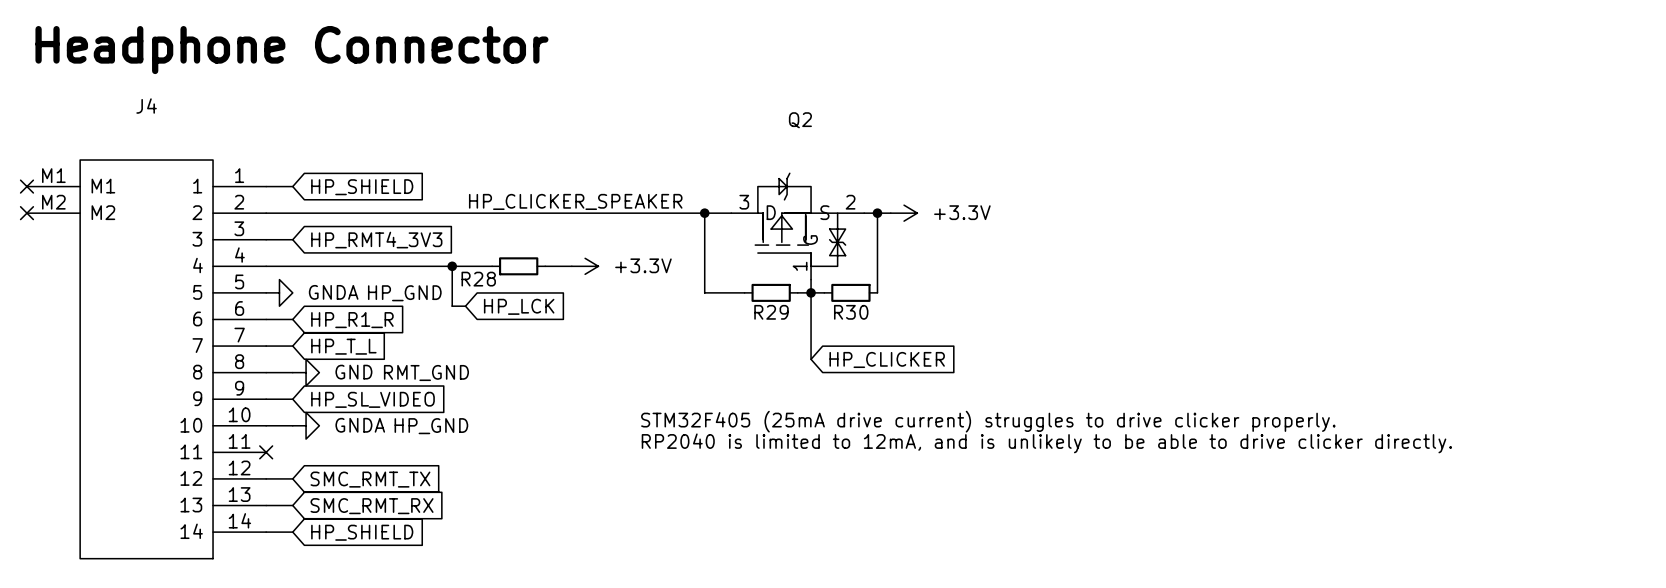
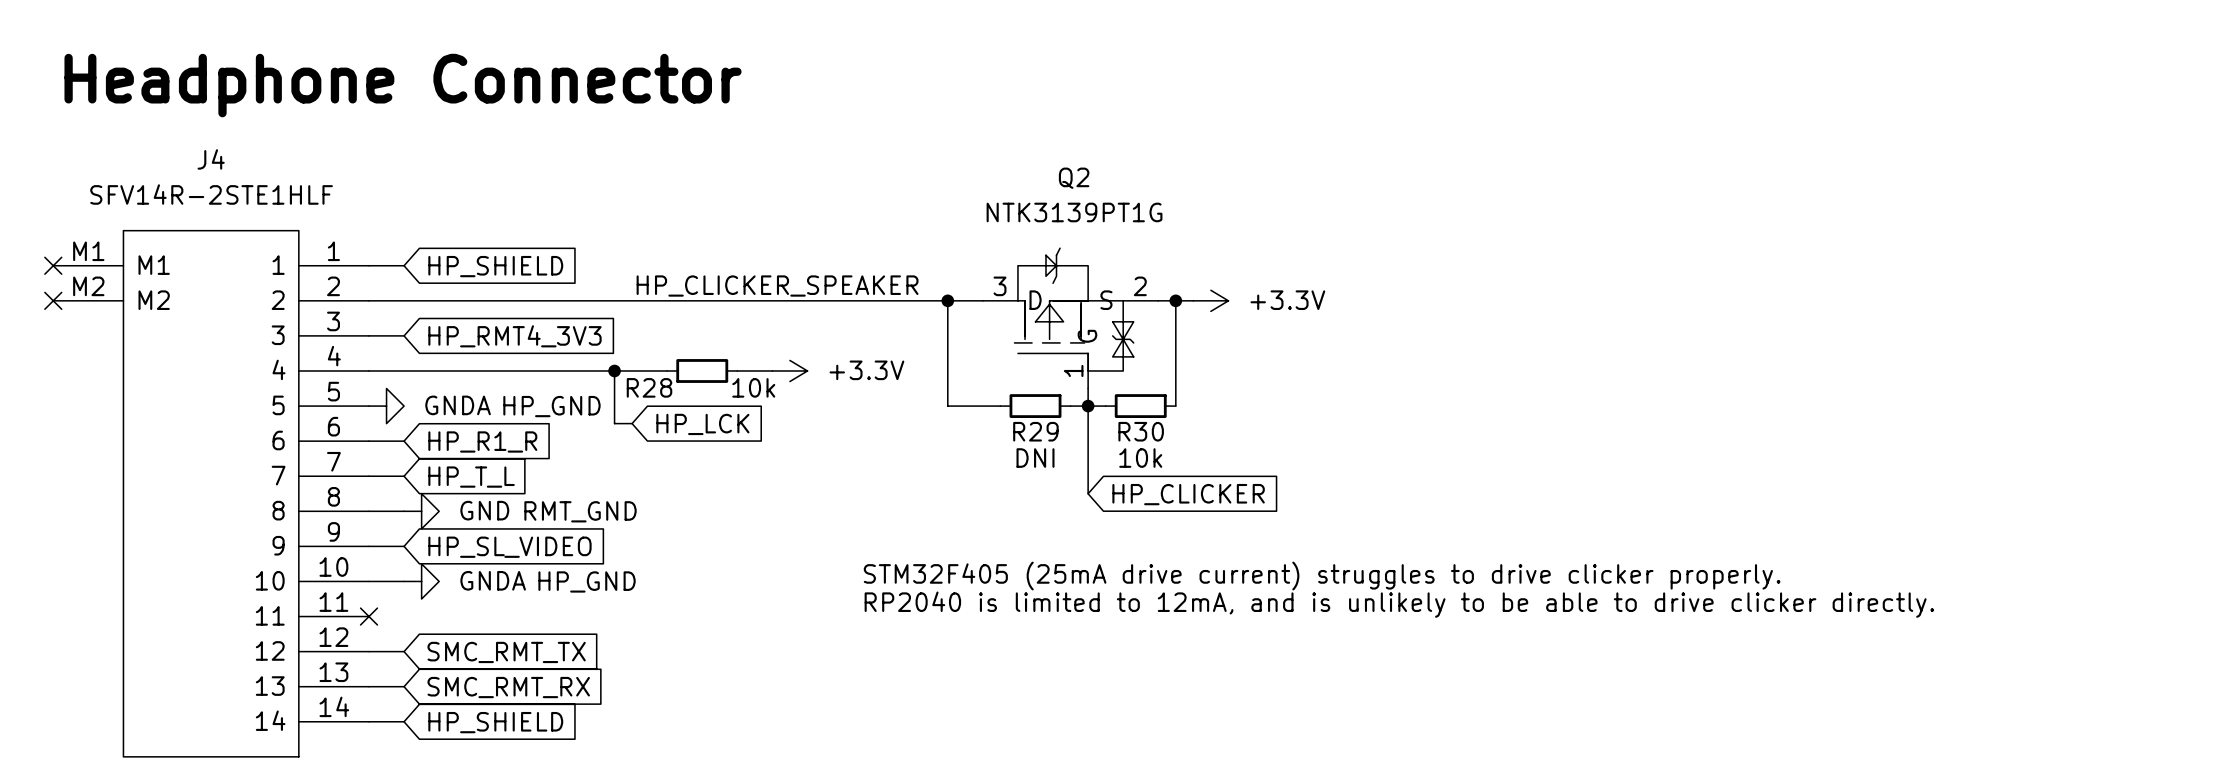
J4 value: none -> SFV14R-2STE1HLF (211, 194)
Q2 value: none -> NTK3139PT1G (1074, 212)
R28 value: none -> 10k (753, 387)
R29 value: none -> DNI (1035, 458)
R30 value: none -> 10k (1140, 458)

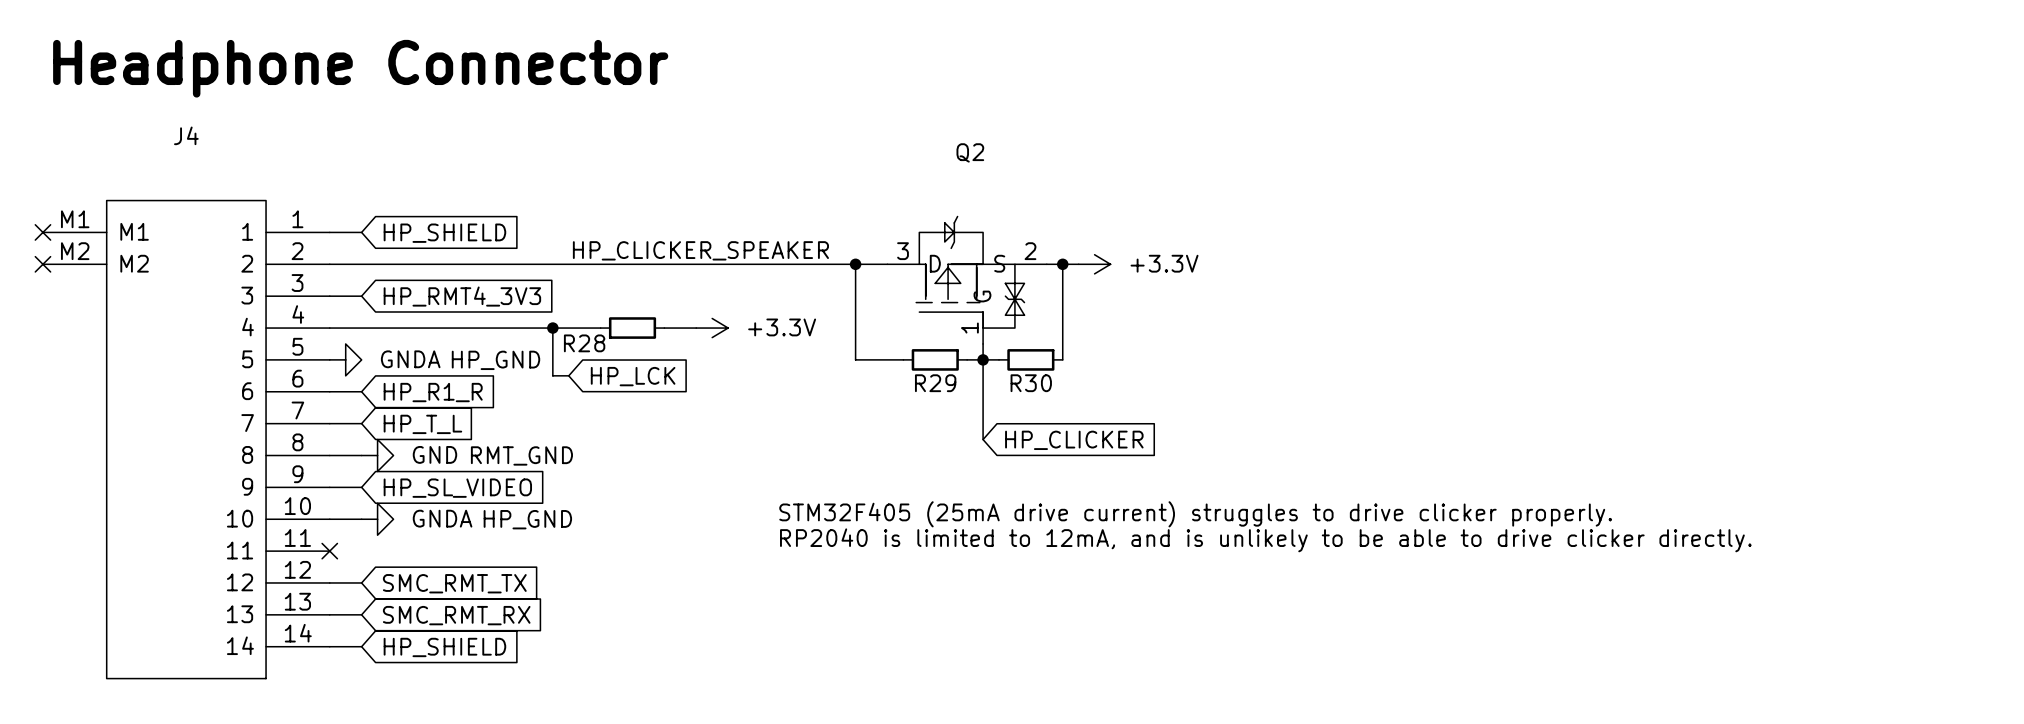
J4 value: SFV14R-2STE1HLF (211, 194) -> none
Q2 value: NTK3139PT1G (1074, 212) -> none
R28 value: 10k (753, 387) -> none
R29 value: DNI (1035, 458) -> none
R30 value: 10k (1140, 458) -> none

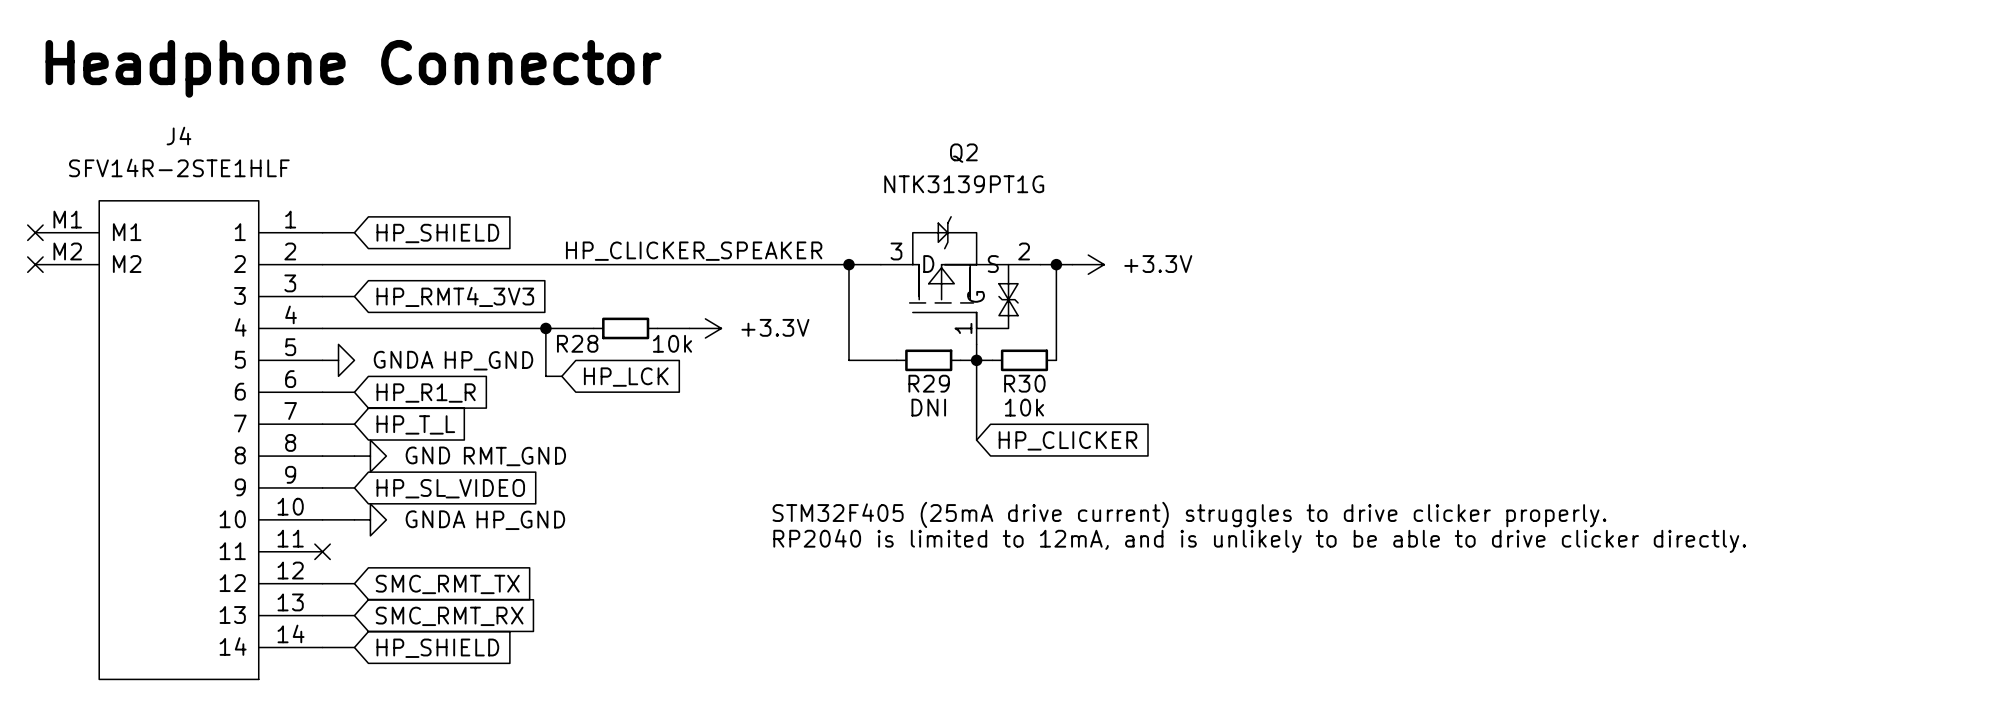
J4 value: none -> SFV14R-2STE1HLF (179, 167)
Q2 value: none -> NTK3139PT1G (964, 184)
R28 value: none -> 10k (672, 343)
R29 value: none -> DNI (928, 407)
R30 value: none -> 10k (1024, 407)

